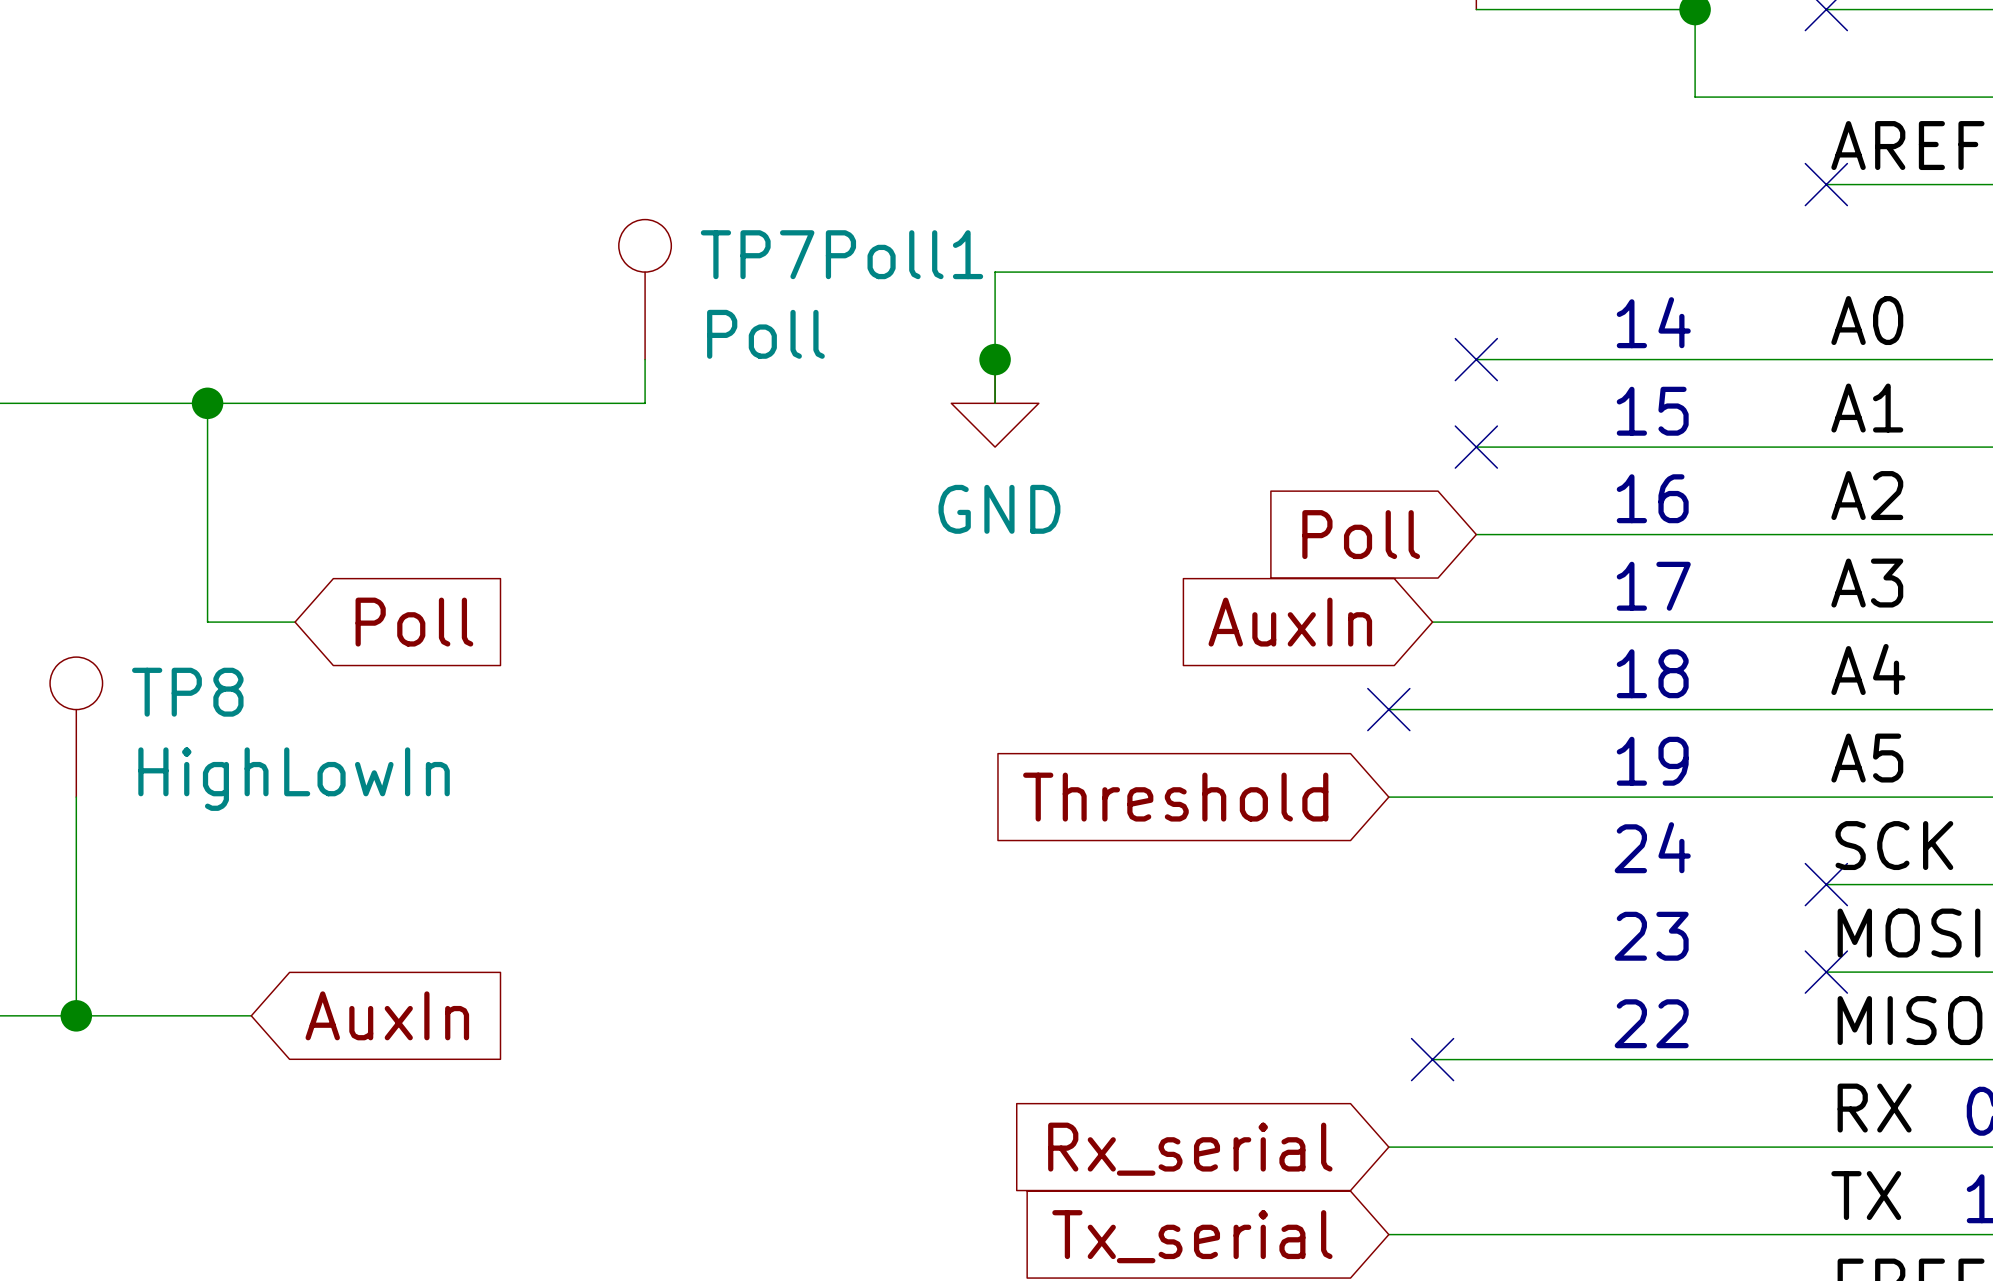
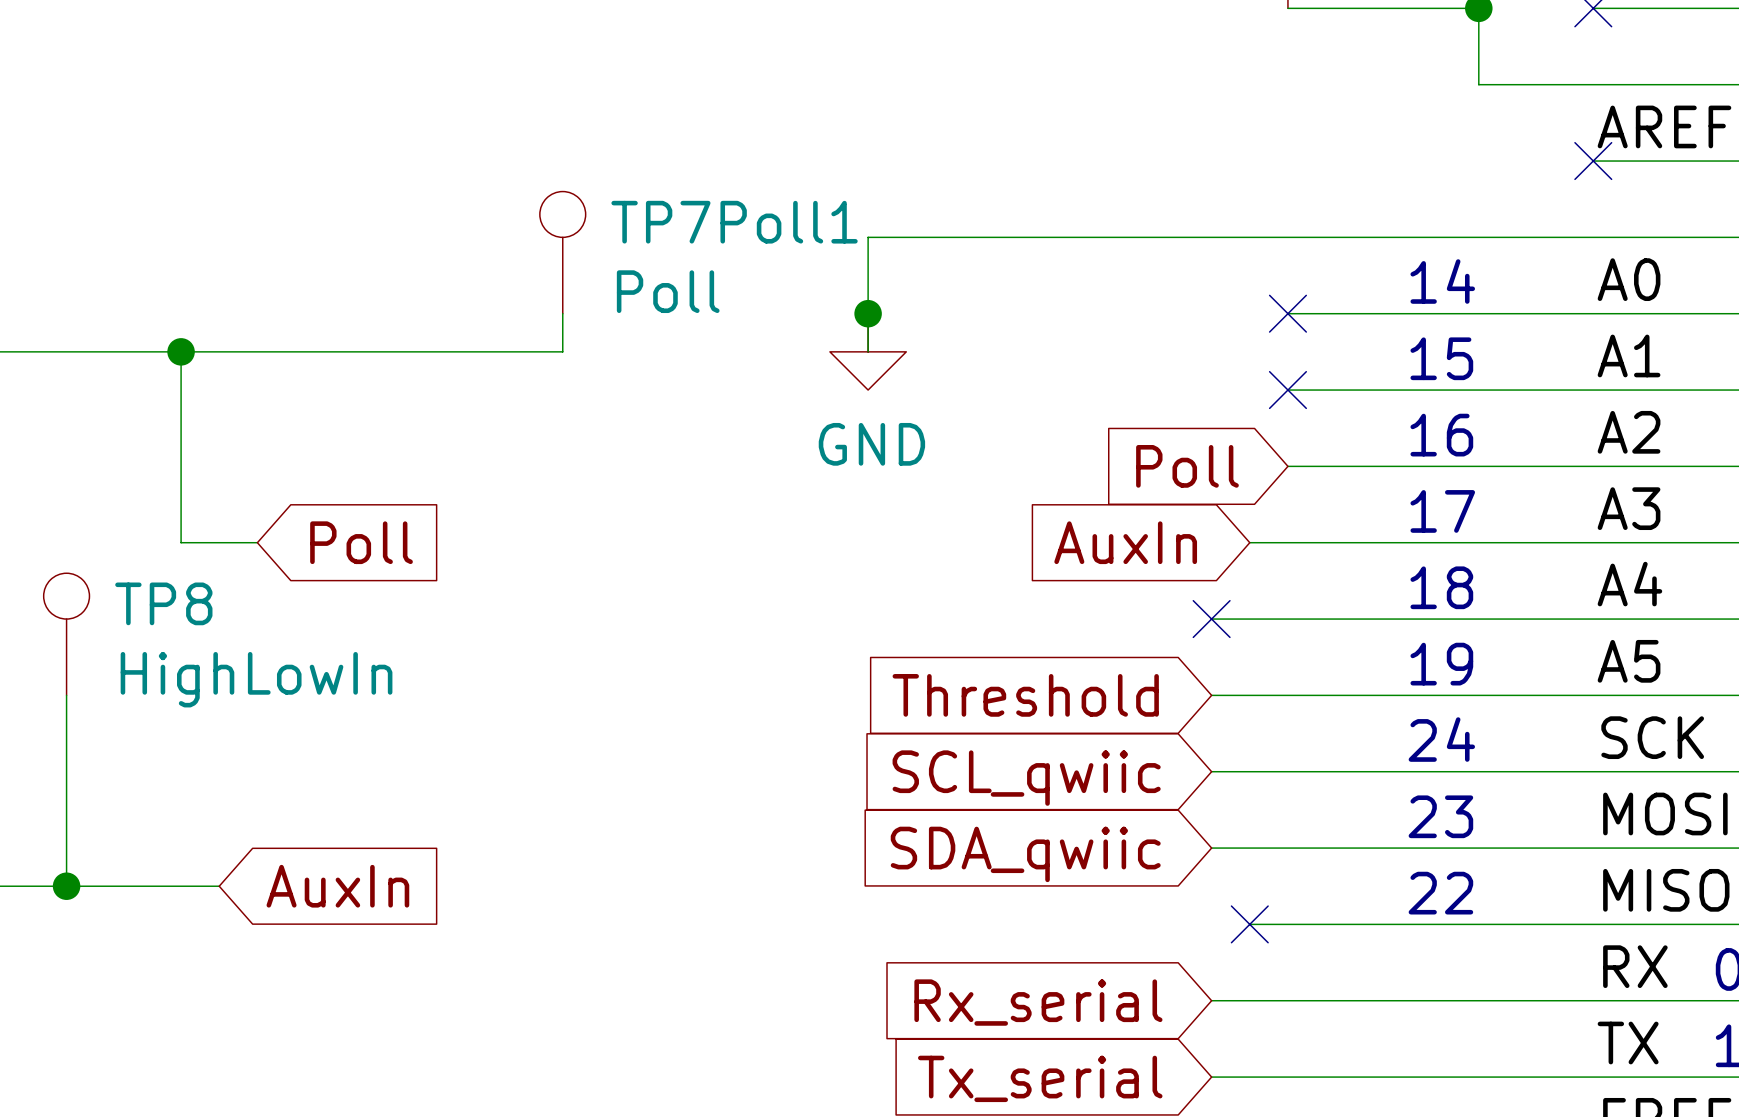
wire: none -> (1211, 771) (1593, 771)
no-connect mark: (1826, 884) -> none
global label: none -> SCL_qwiic (1026, 778)
wire: none -> (1211, 848) (1593, 848)
no-connect mark: (1826, 972) -> none
global label: none -> SDA_qwiic (1025, 854)

